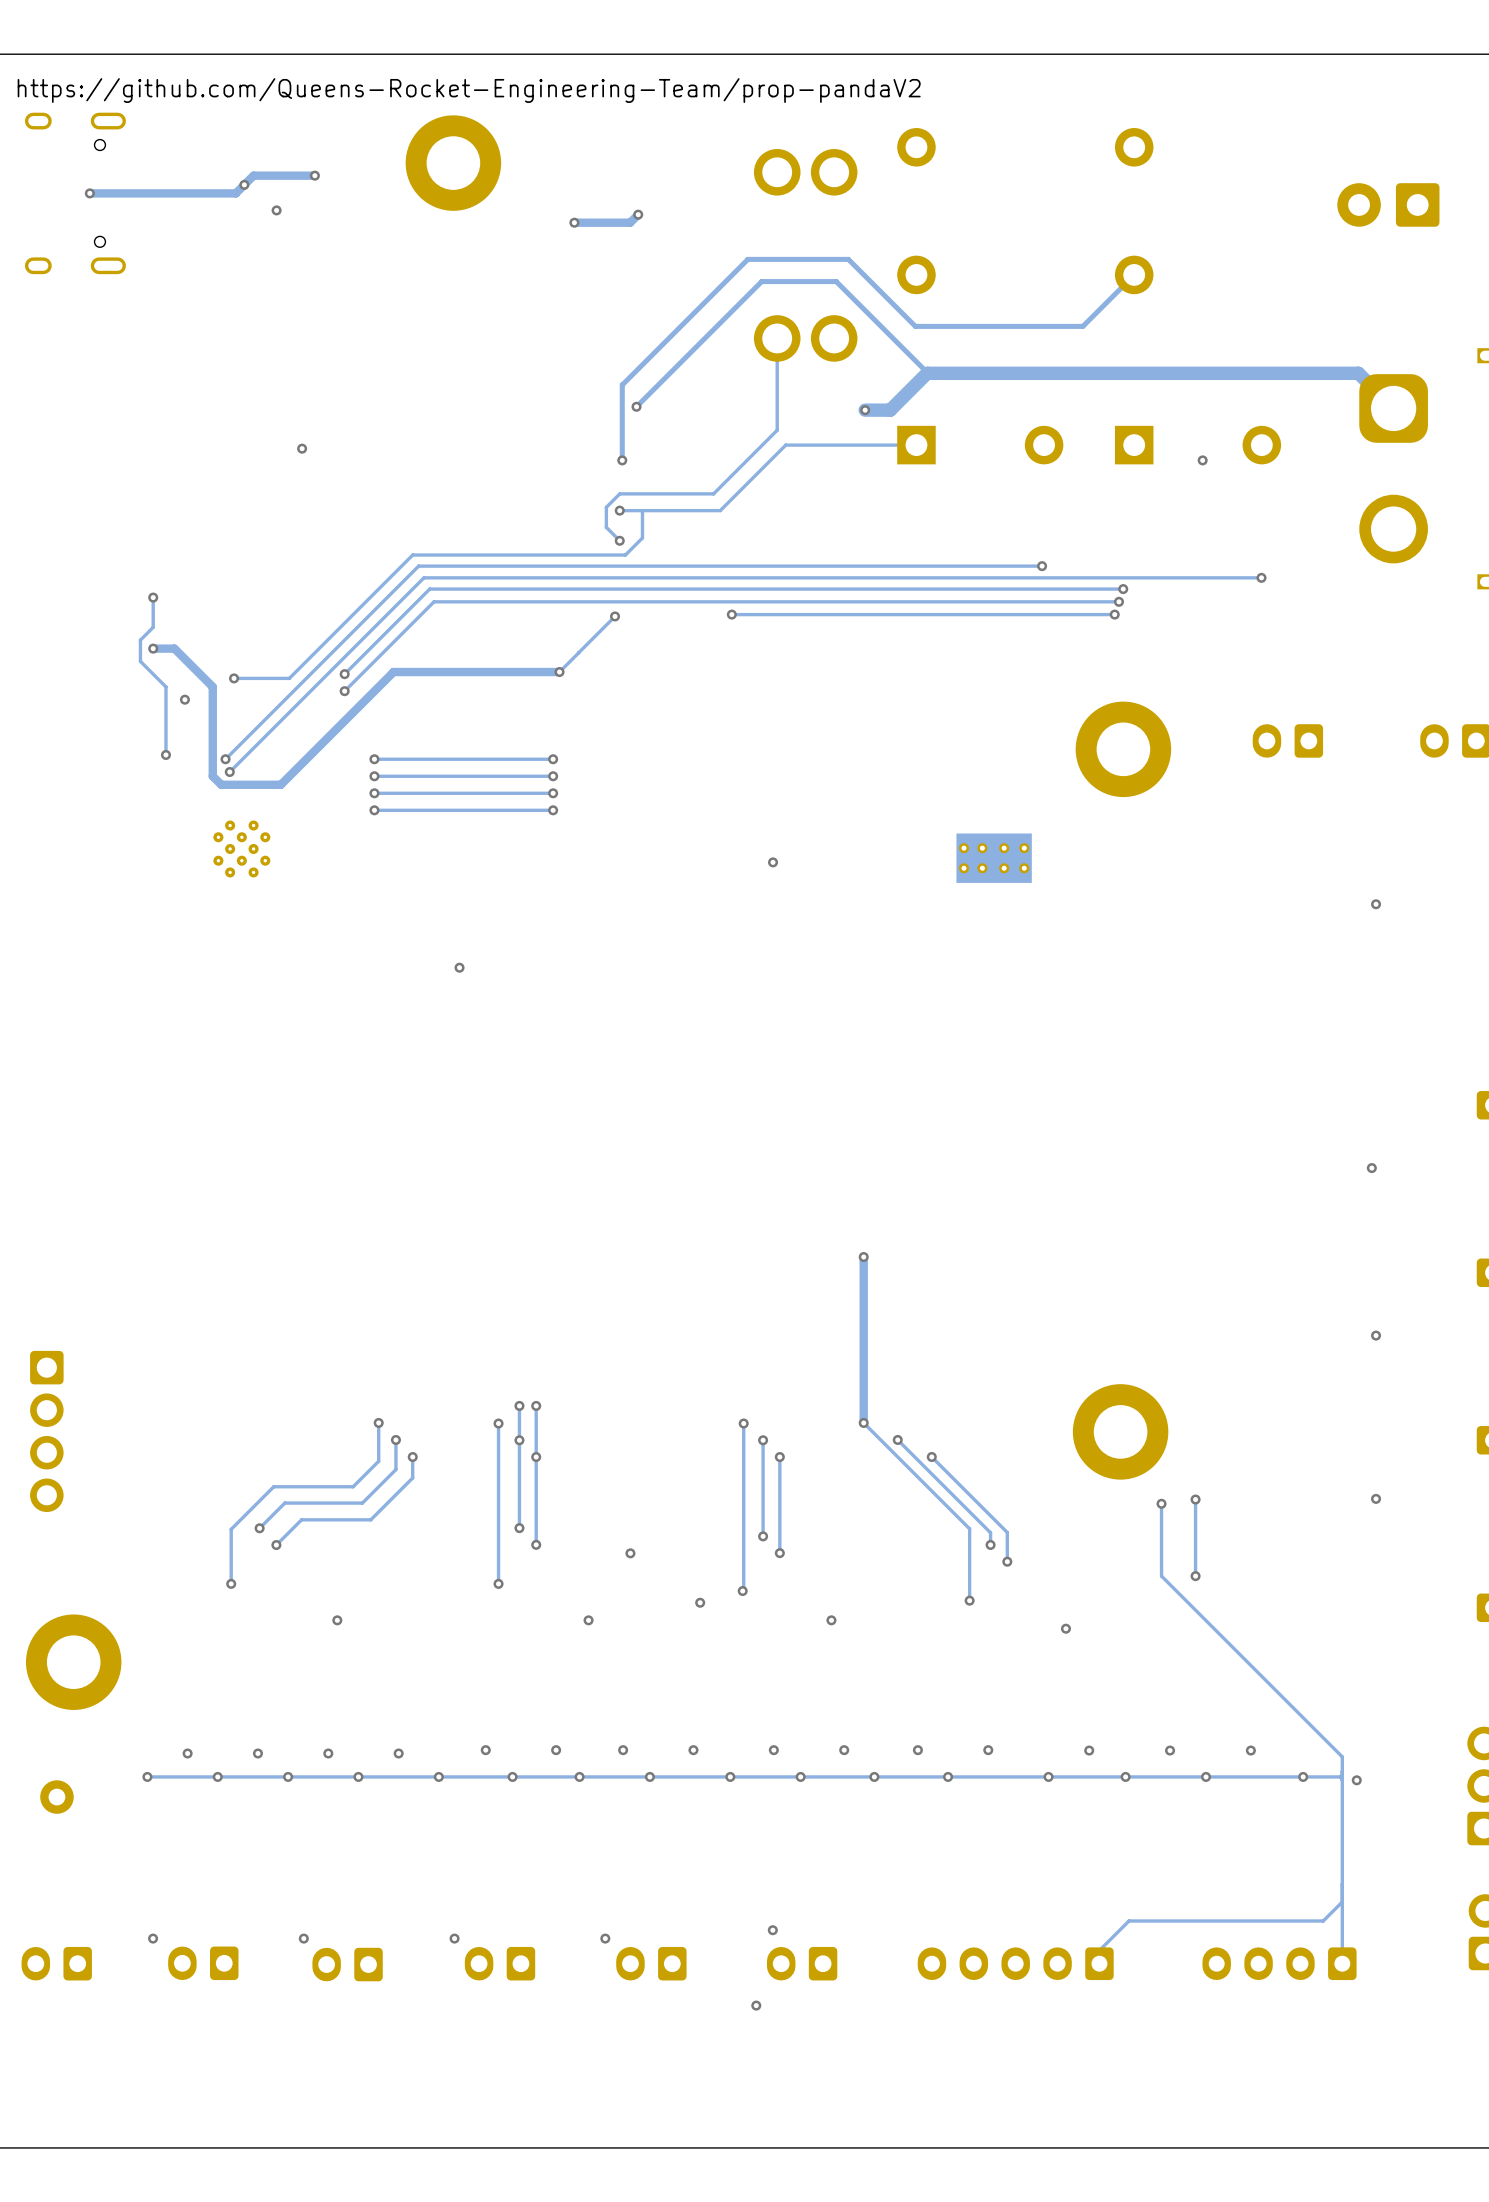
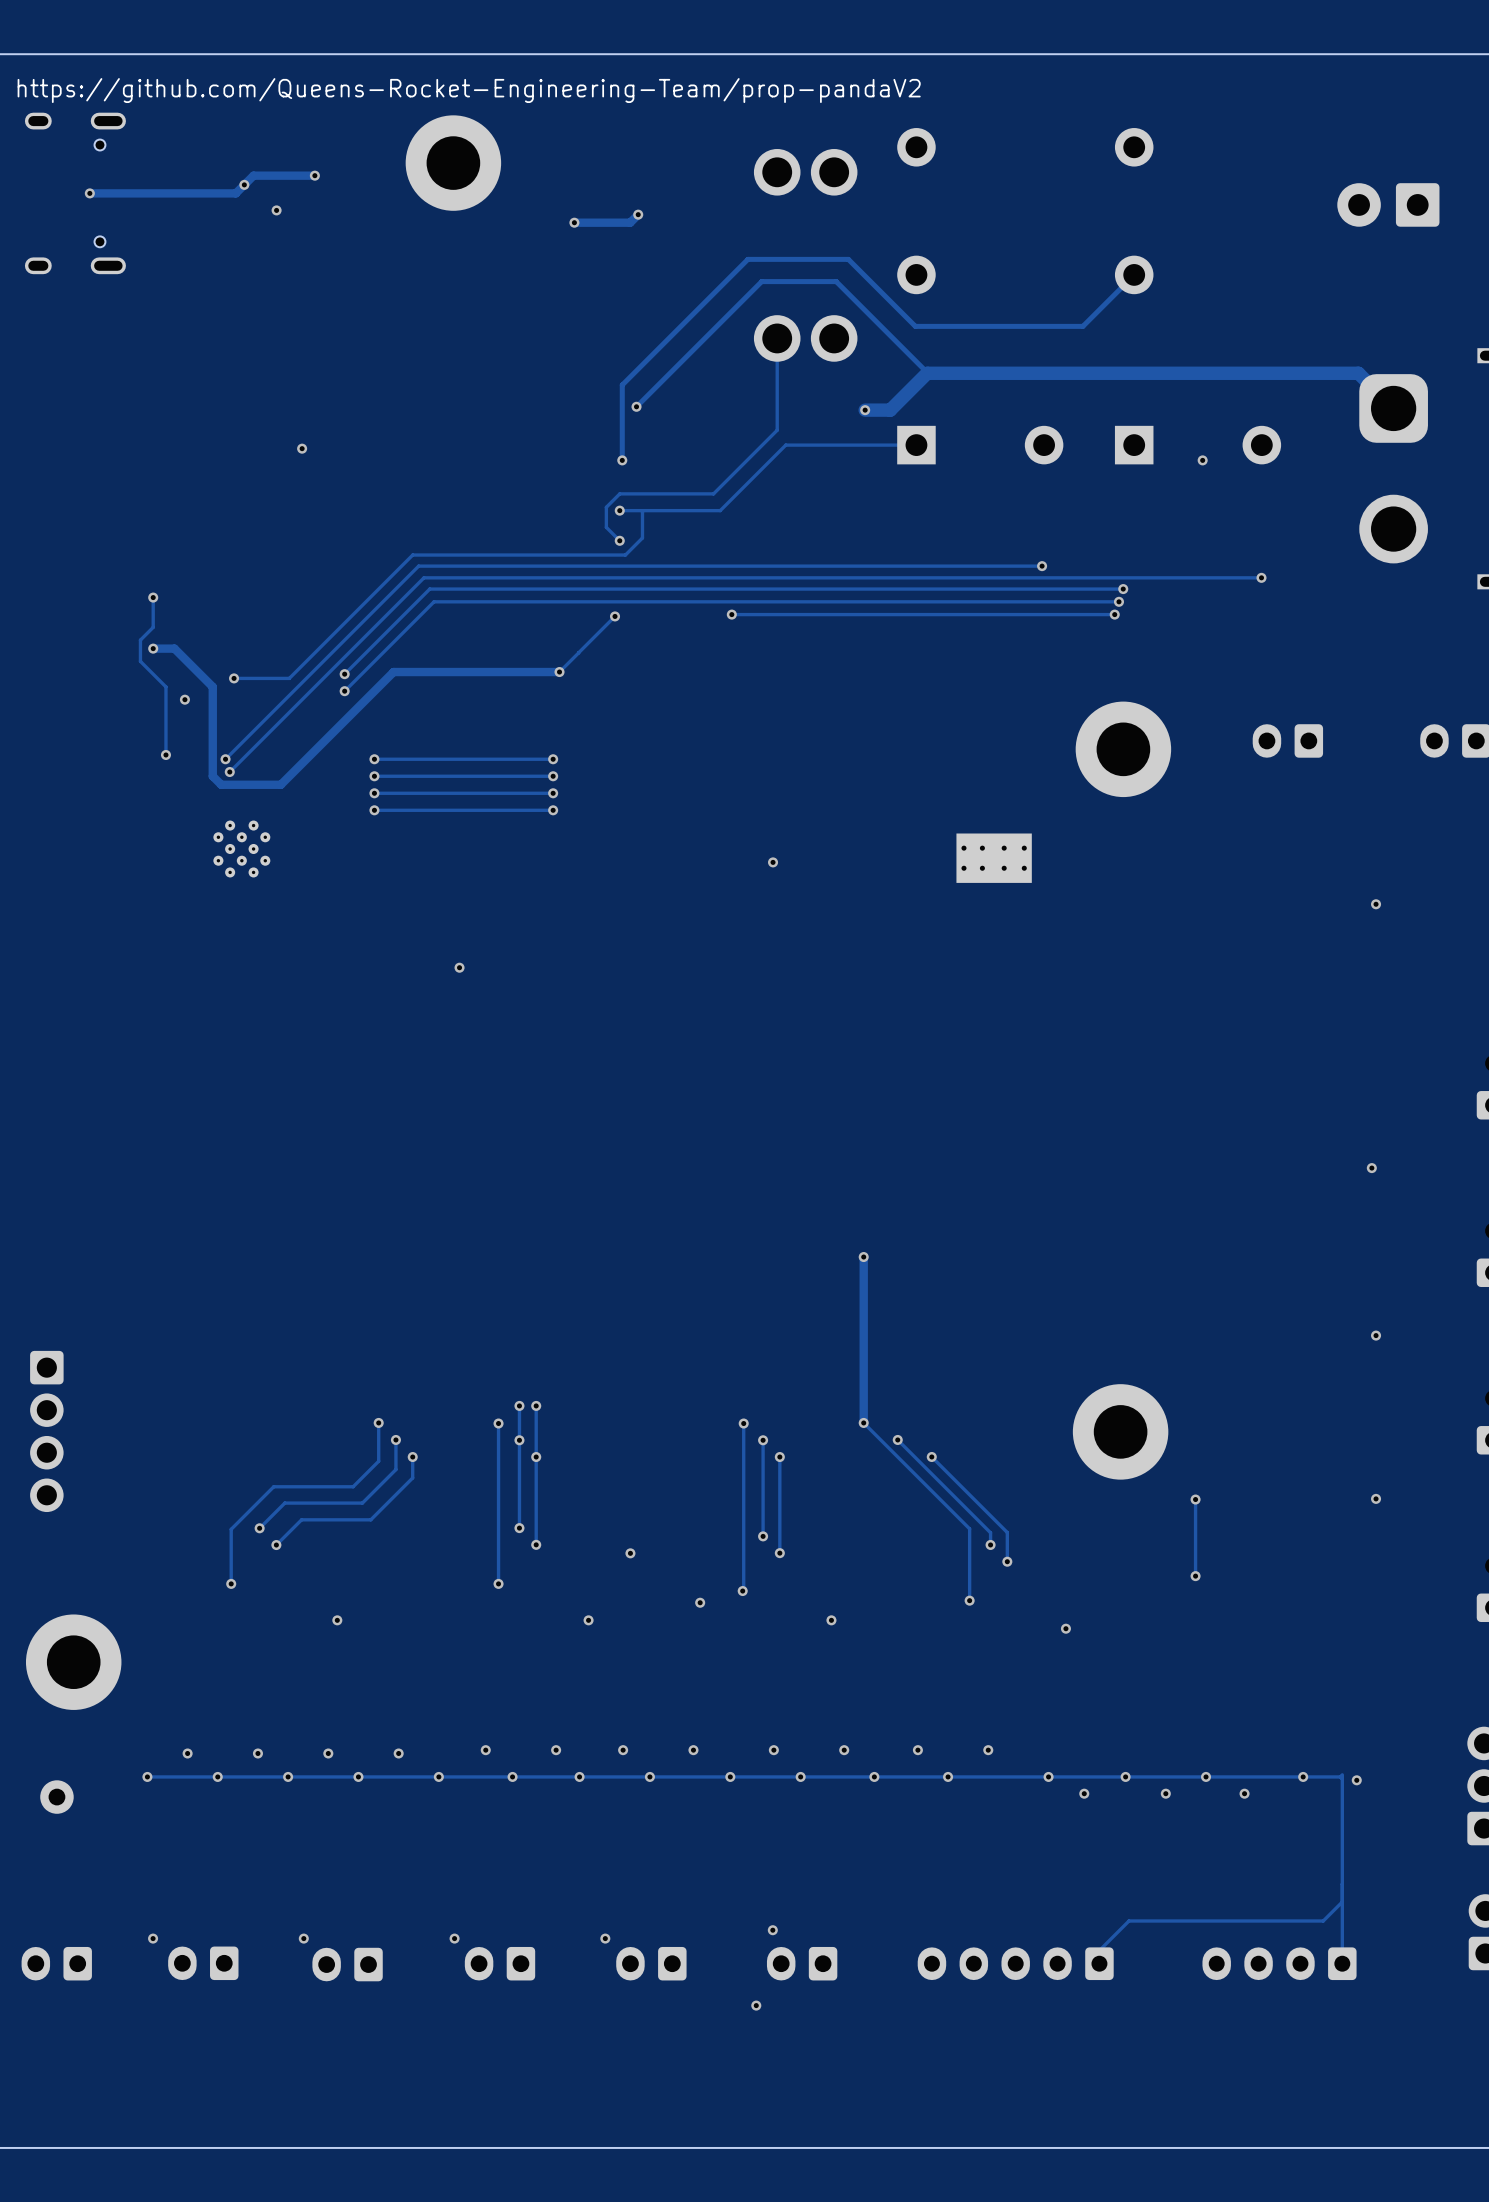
track: (1161, 1503) (1161, 1576) (1342, 1756) (1342, 1776) -> none
via: (1161, 1503) -> none
via position: (1089, 1750) -> (1084, 1793)
via: (1170, 1750) -> none
via: (1250, 1750) -> none
via: none -> (1165, 1793)
via: none -> (1244, 1793)

